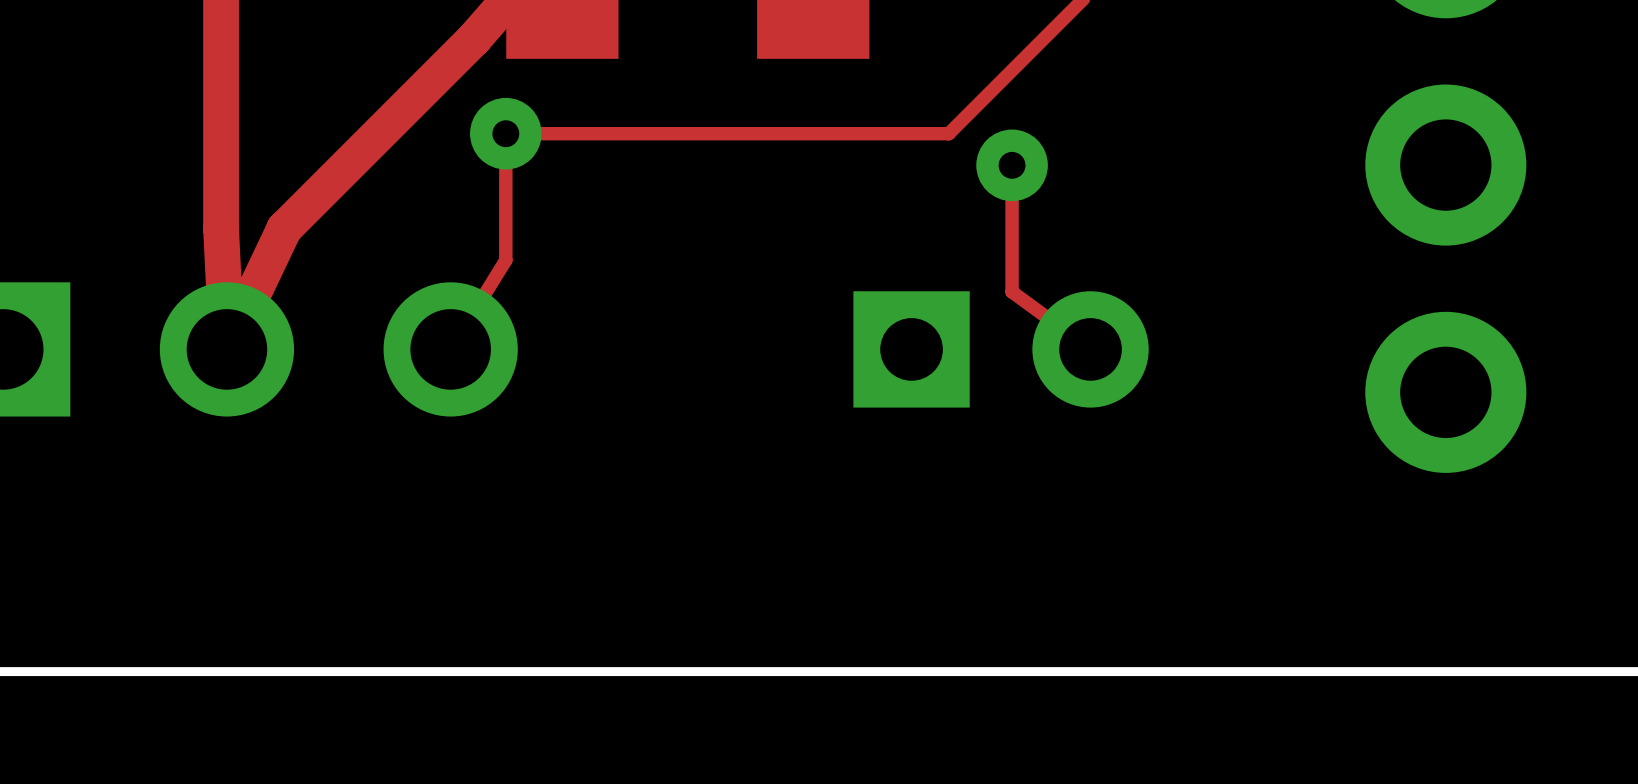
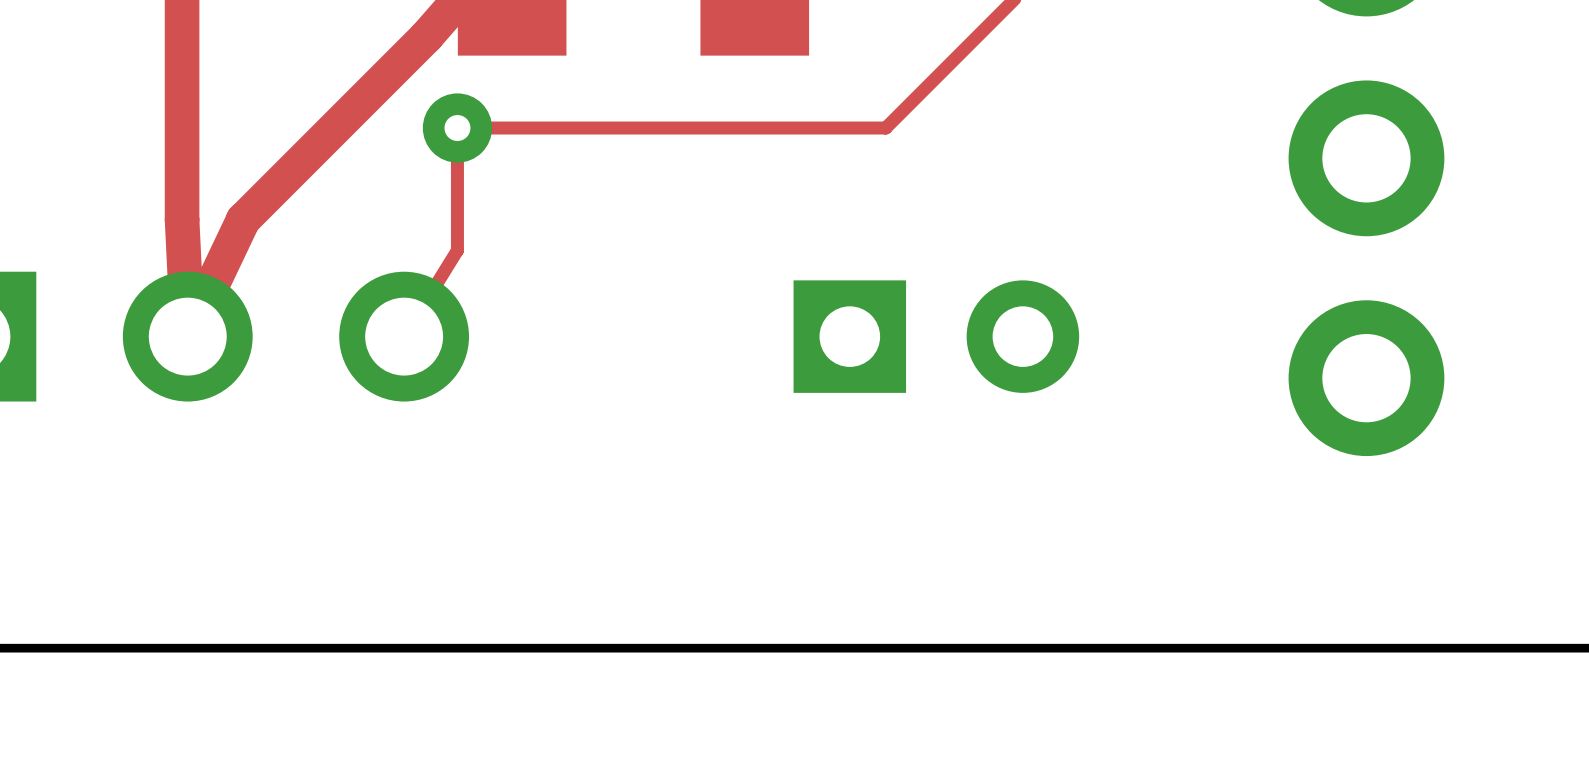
track: (1012, 165) (1012, 291) (1090, 349) -> none
via: (1012, 165) -> none

